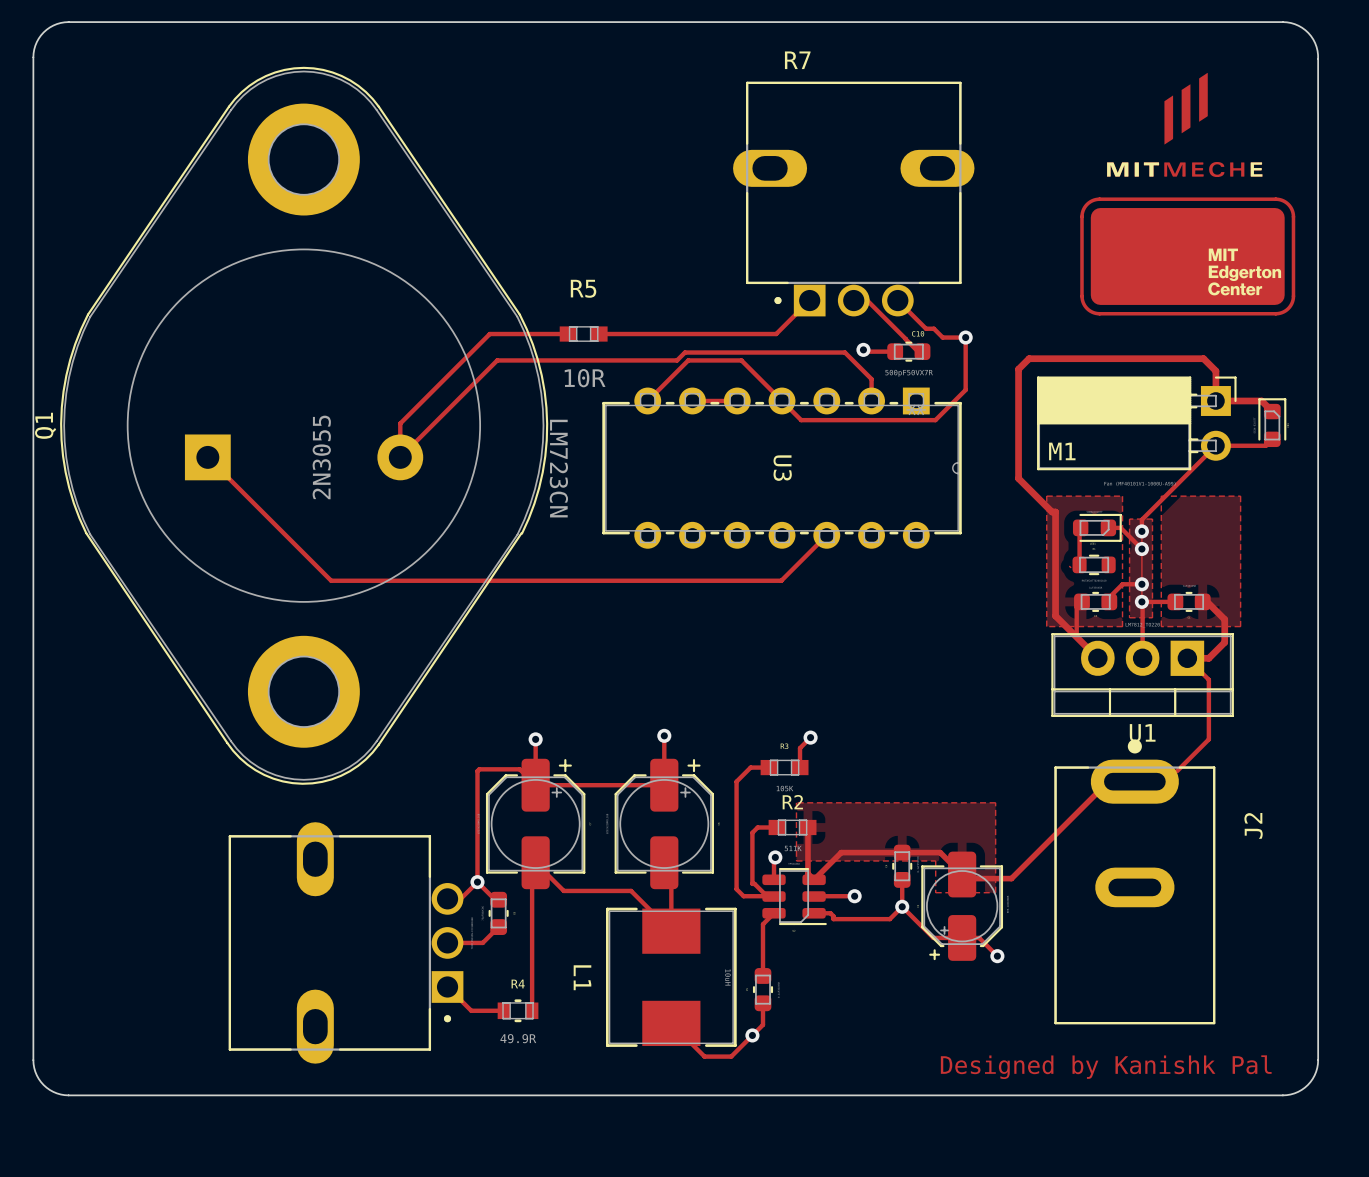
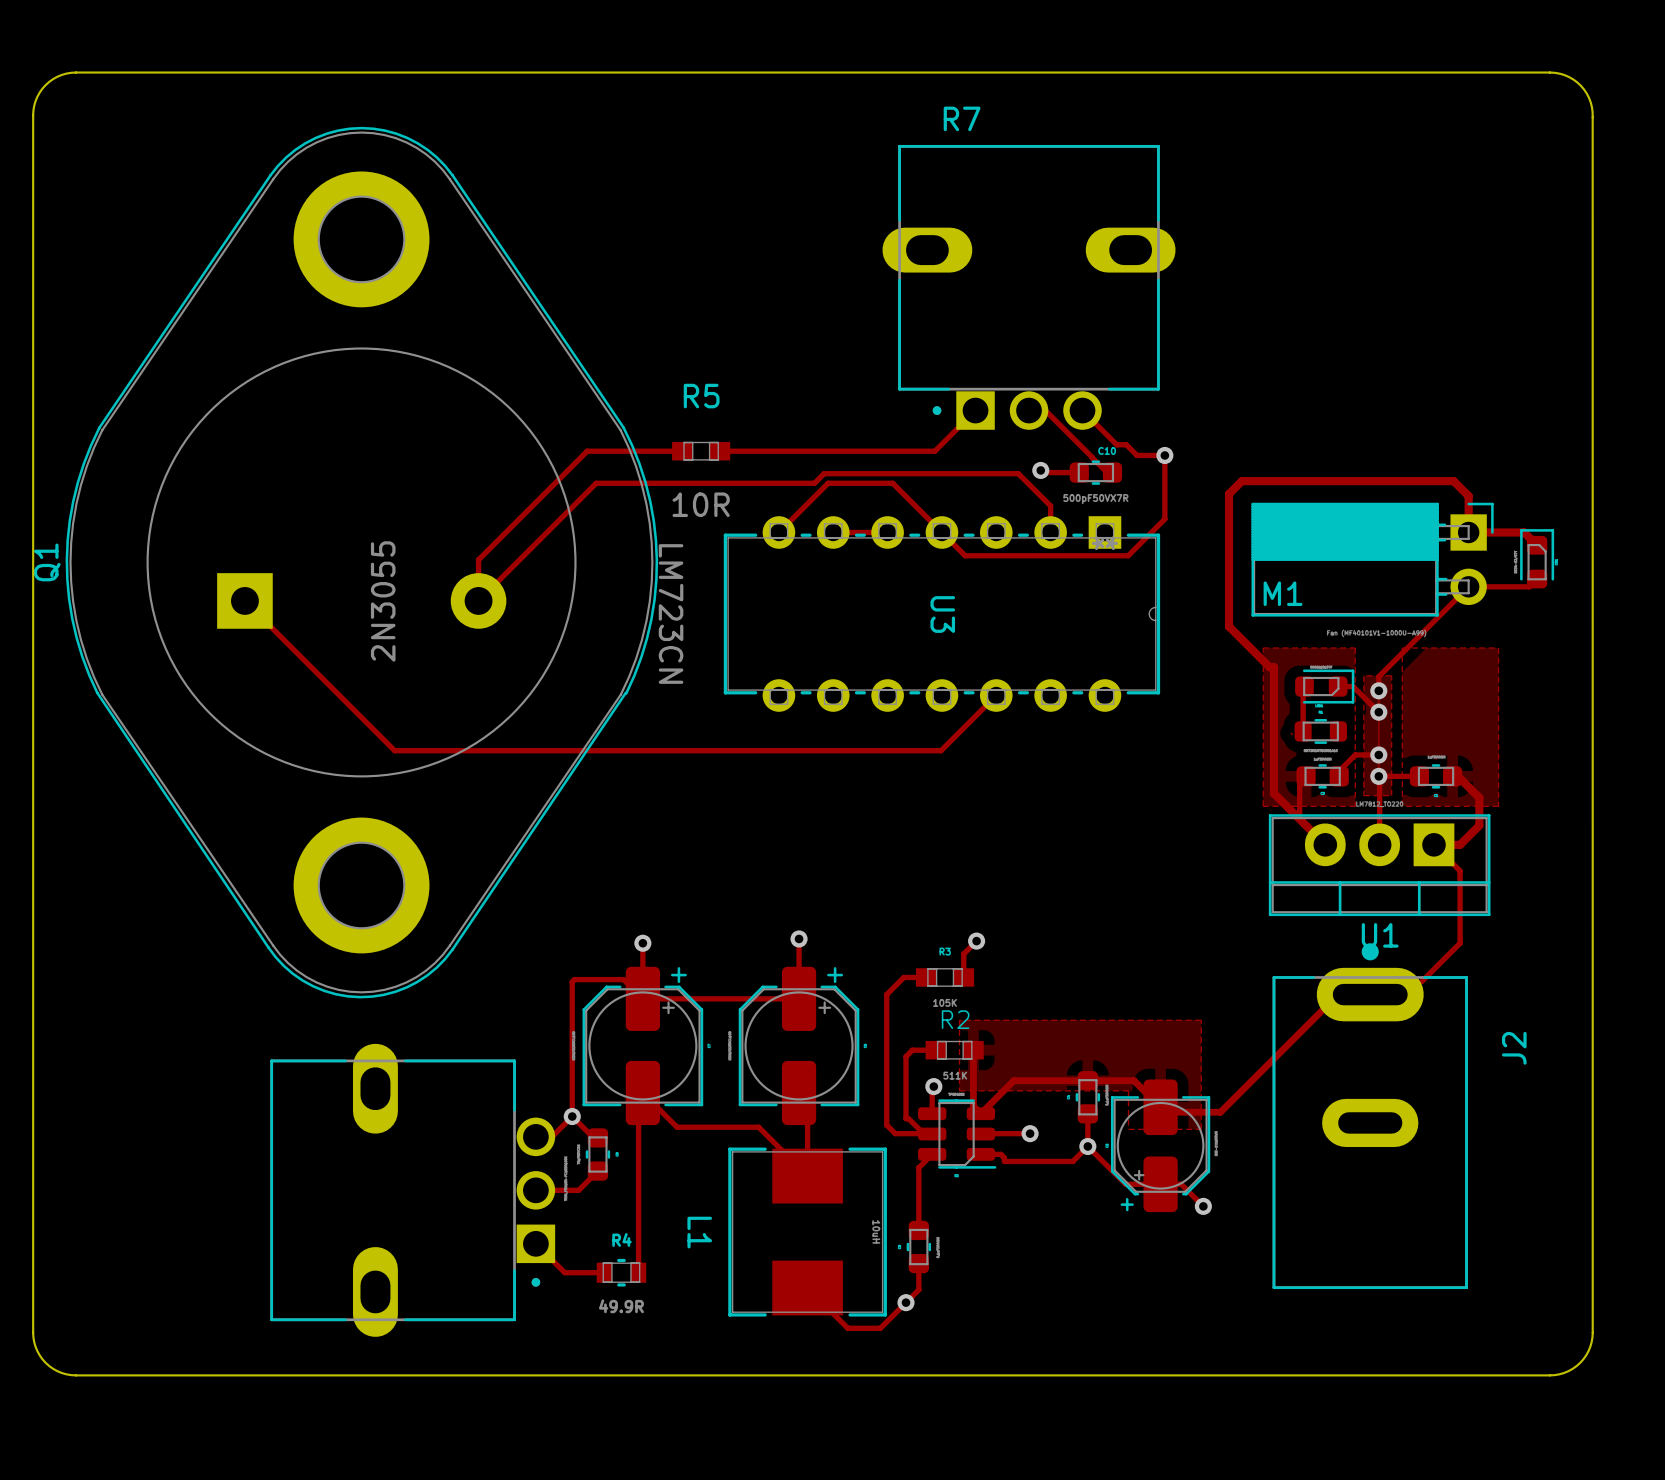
drawing: [1107, 72, 1263, 178] -> none
part: (1187, 256) -> none
text: Designed by Kanishk Pal (1106, 1067) -> none

